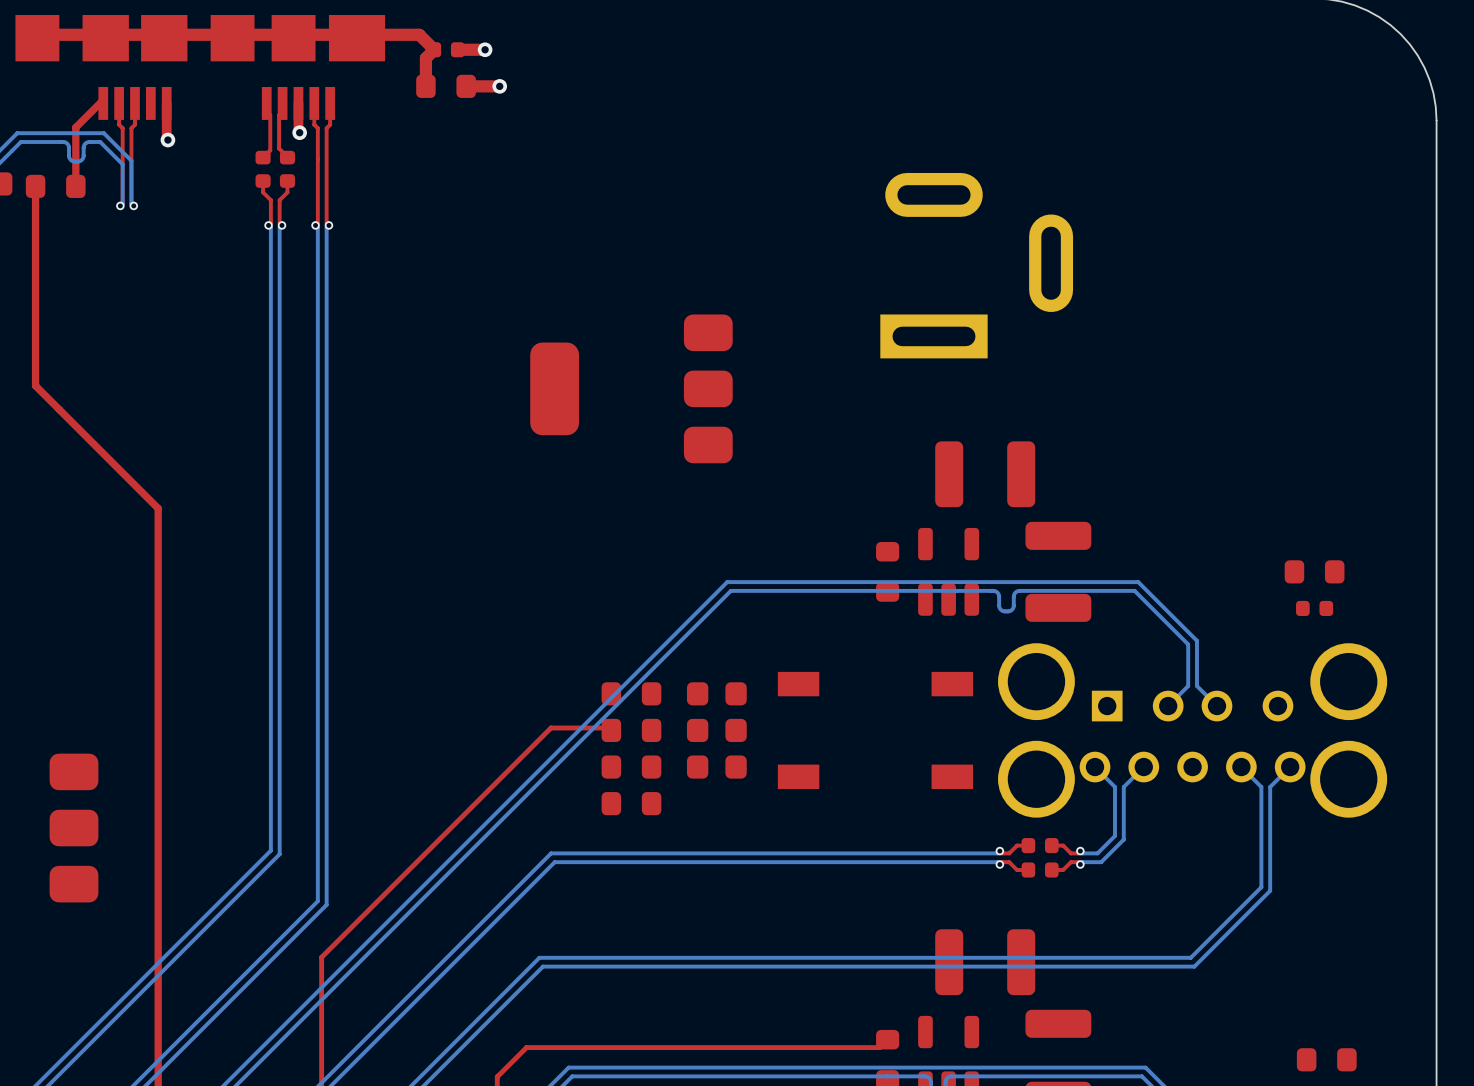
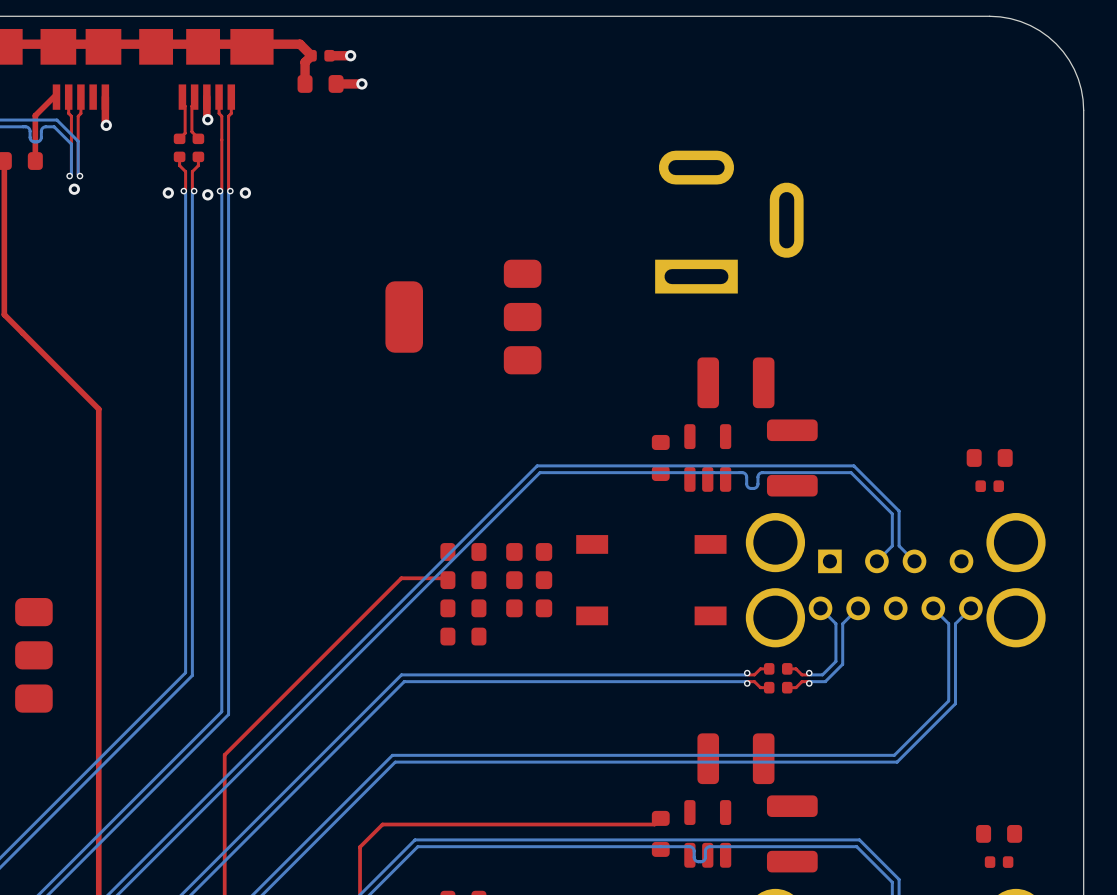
via: none -> (74, 189)
via: none -> (168, 192)
via: none -> (245, 192)
via: none -> (207, 194)

